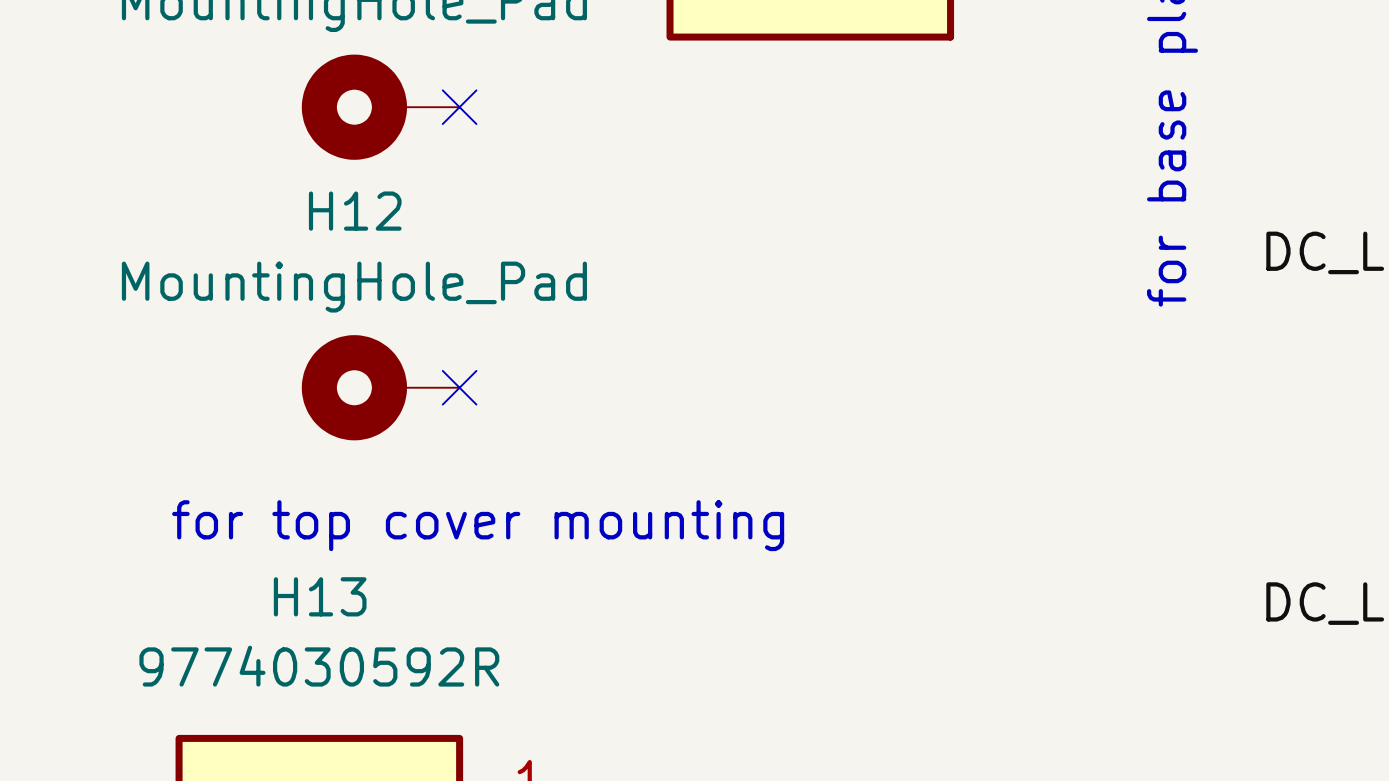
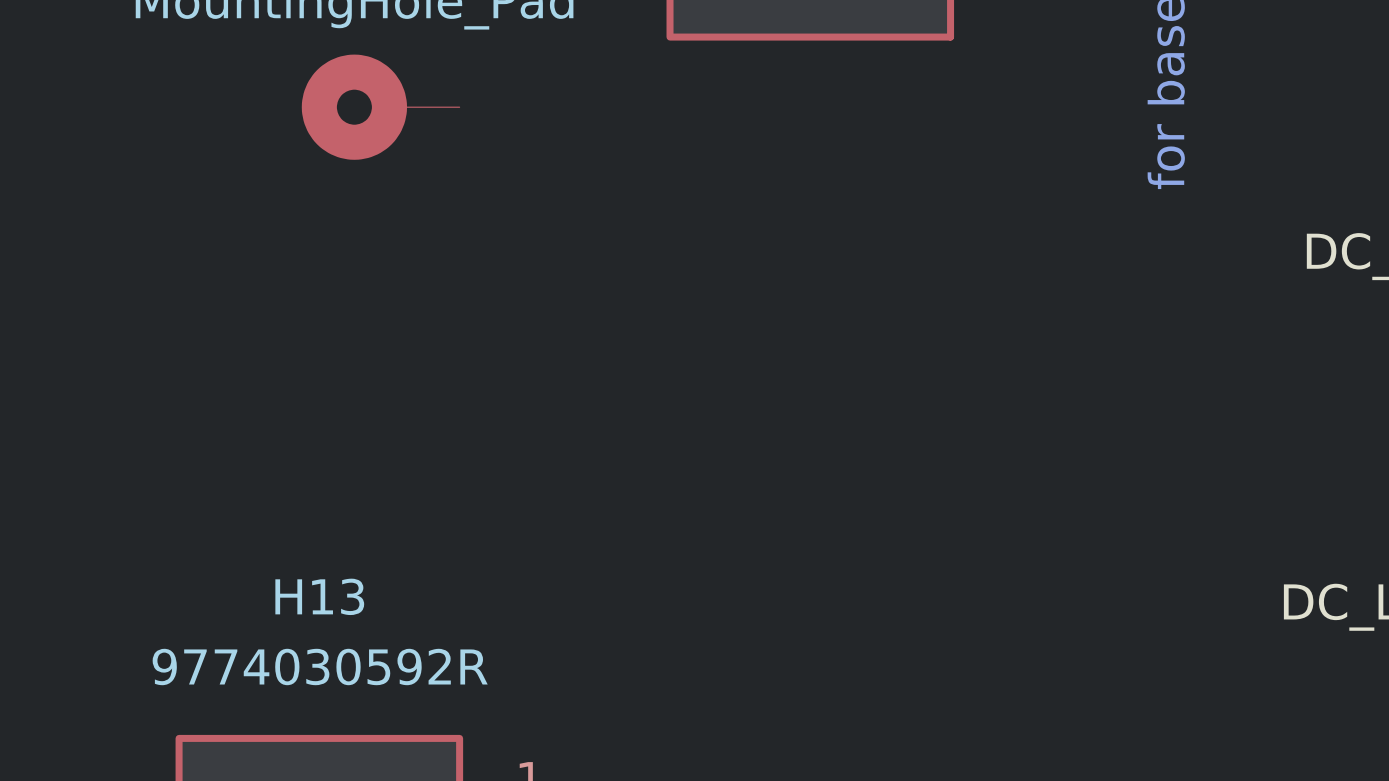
no-connect mark: (459, 107) -> none
H12: MountingHole_Pad (380, 387) -> none
no-connect mark: (459, 387) -> none
text: for top cover mounting (478, 525) -> none

